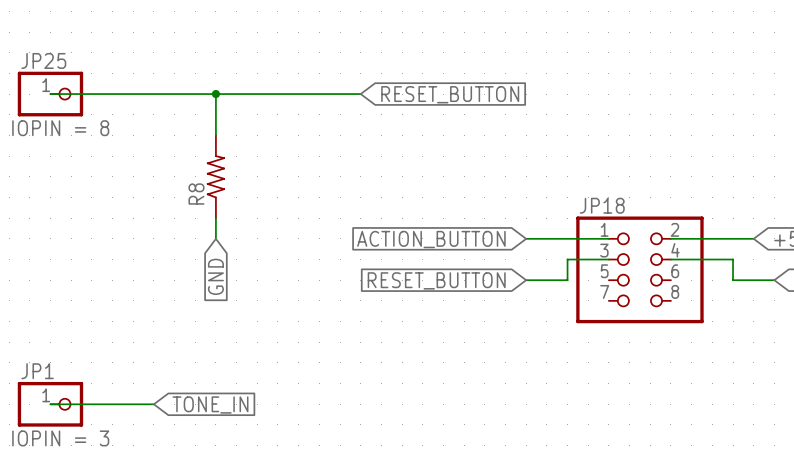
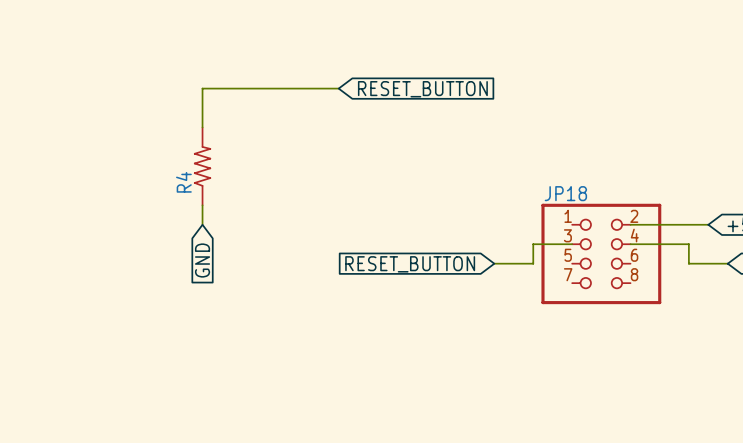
wire: (50, 94) (215, 94) -> none
JP25: (50, 94) -> none
junction: (215, 94) -> none
R8 name: R8 (196, 194) -> R4 (183, 182)
wire: (526, 238) (608, 238) -> none
global label: ACTION_BUTTON (431, 239) -> none
wire: (50, 404) (153, 404) -> none
JP1: (50, 404) -> none
global label: TONE_IN (210, 404) -> none

